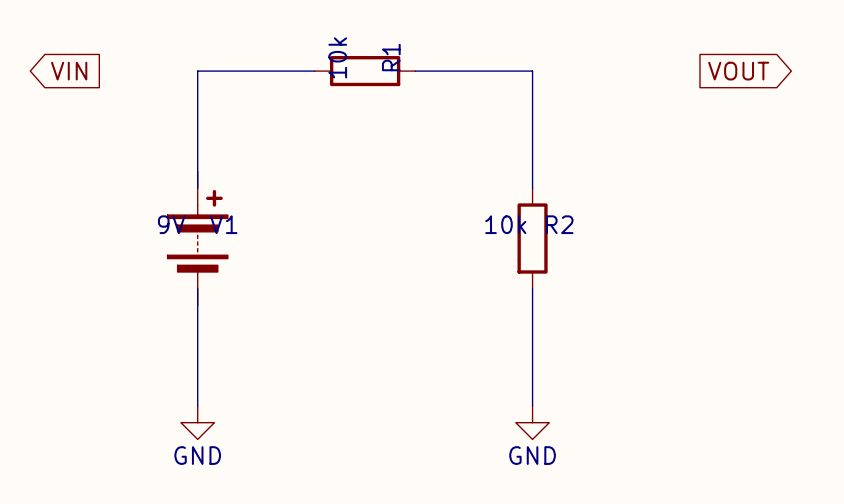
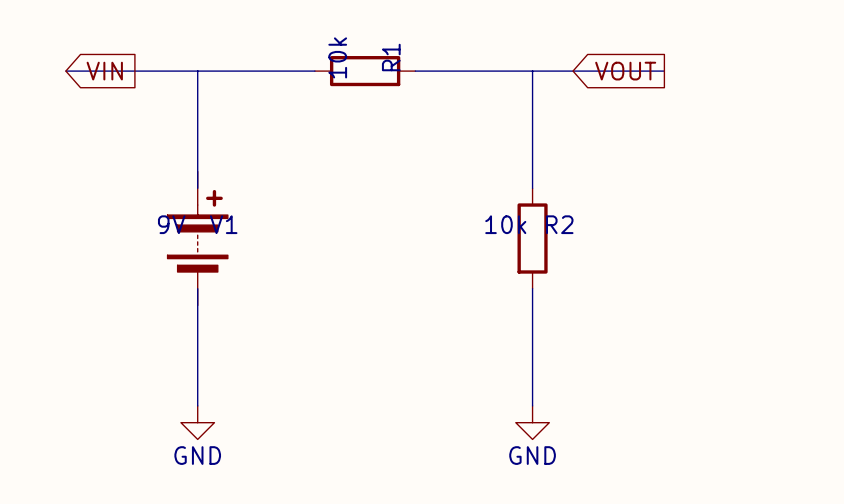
wire: none -> (65, 71) (197, 71)
global label position: VIN (69, 71) -> VIN (104, 71)
wire: none -> (532, 71) (664, 71)
global label rotation: 0° (738, 71) -> 180° (625, 71)
global label position: VOUT (738, 71) -> VOUT (625, 71)

